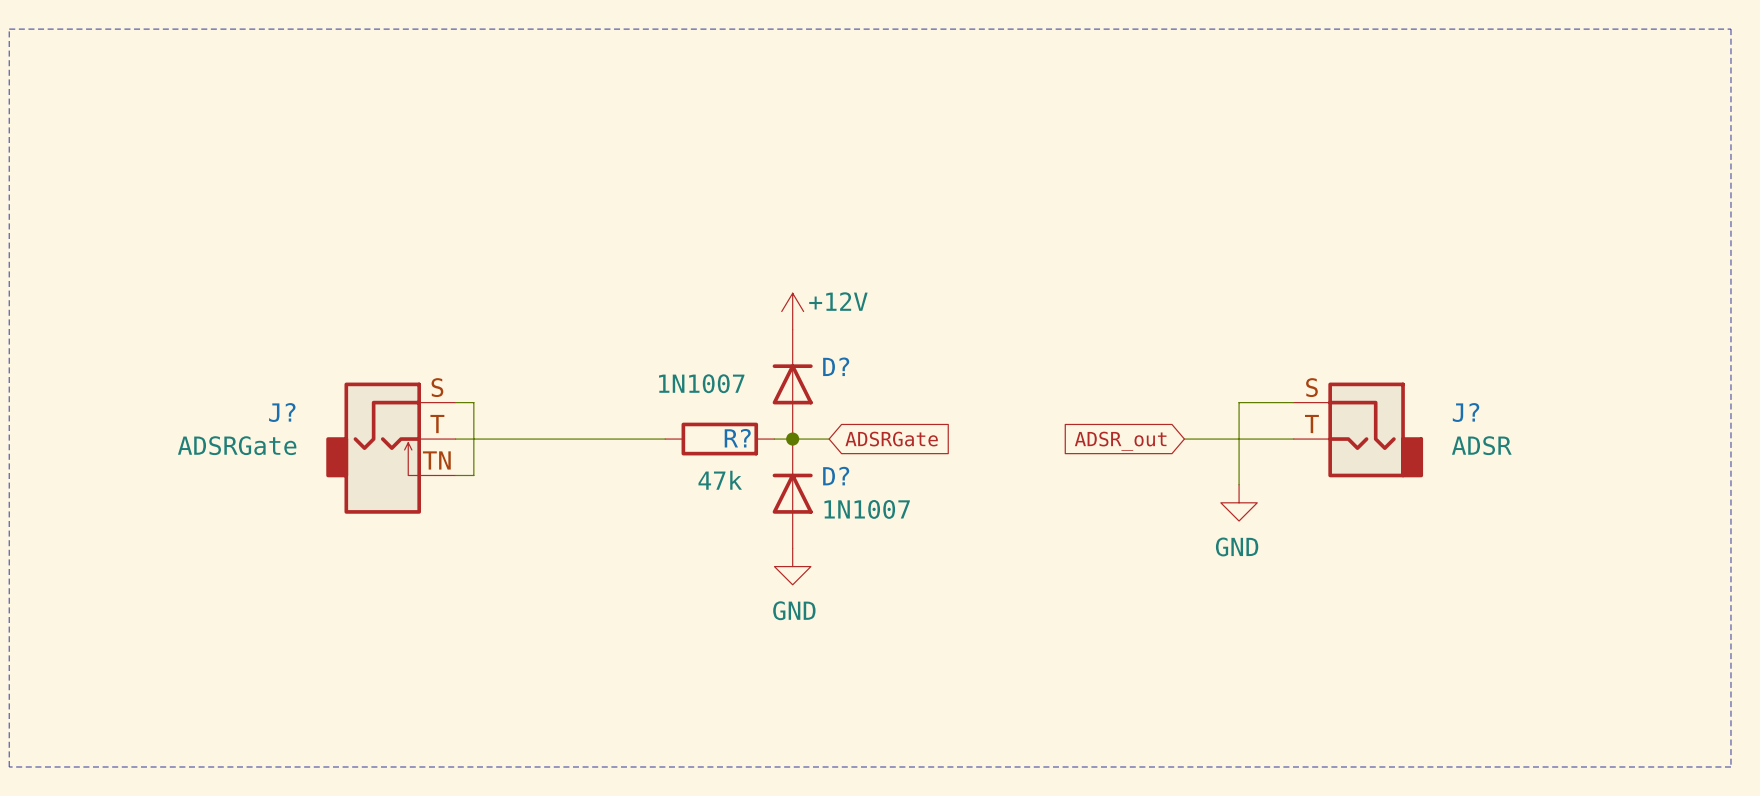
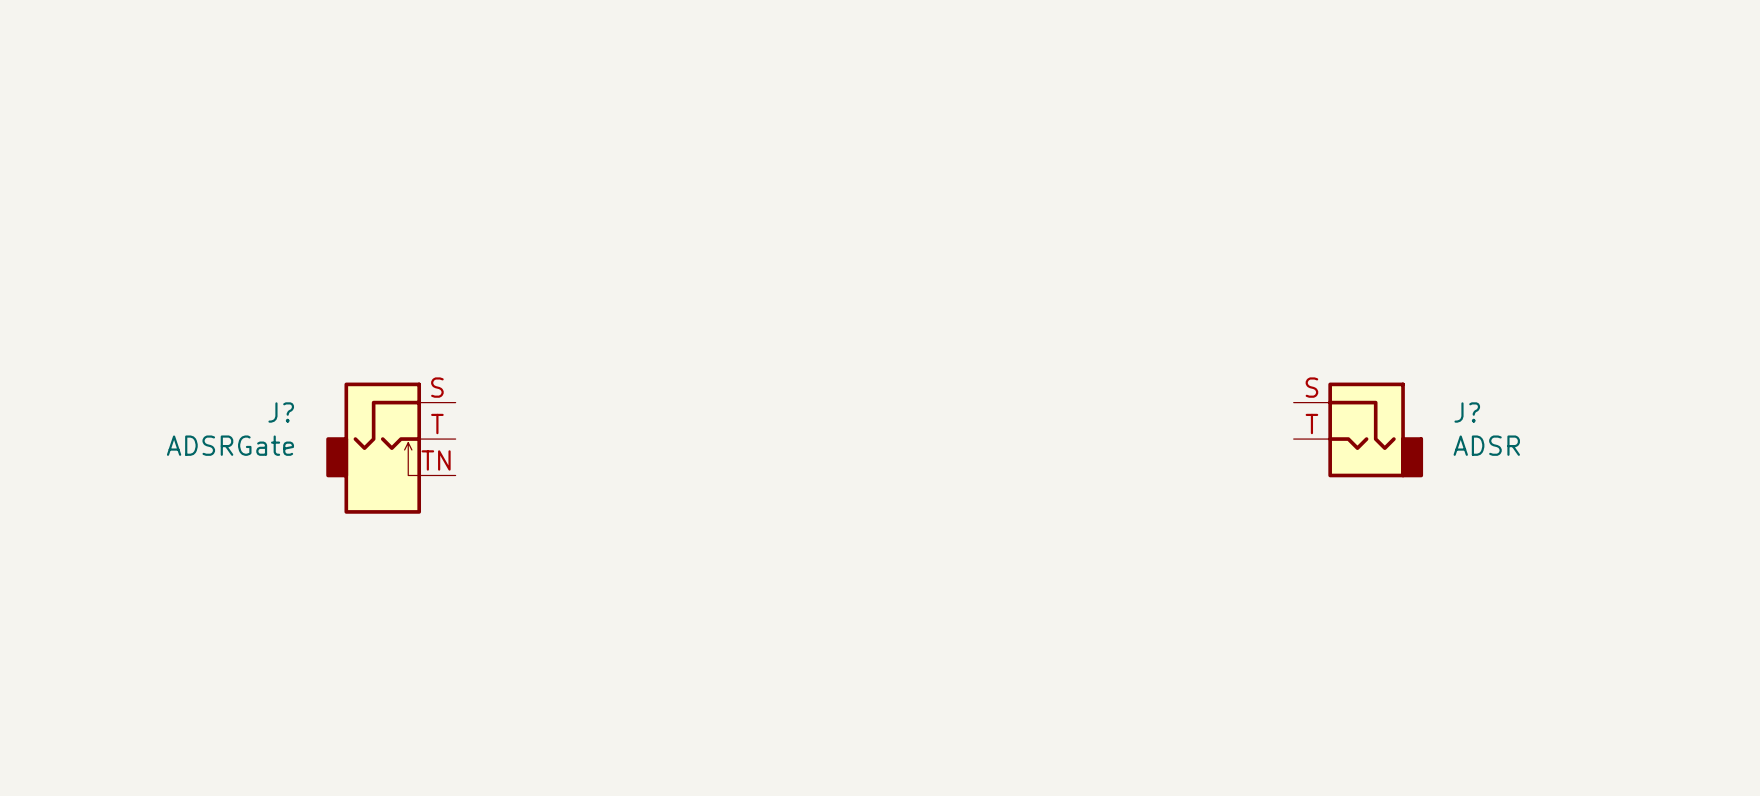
line: (9, 29) (1730, 29) (1730, 767) (9, 767) (9, 29) -> none
power symbol: +12V (792, 311) -> none
D?: 1N1007 (792, 384) -> none
wire: (455, 402) (473, 402) (473, 475) (455, 475) -> none
wire: (1293, 402) (1239, 402) (1239, 484) -> none
wire: (455, 439) (665, 439) -> none
R?: 47k (719, 439) -> none
wire: (774, 439) (829, 439) -> none
junction: (792, 439) -> none
global label: ADSRGate (891, 439) -> none
wire: (1184, 439) (1293, 439) -> none
global label: ADSR_out (1120, 441) -> none
D?: 1N1007 (792, 493) -> none
power symbol: GND (1239, 502) -> none
power symbol: GND (792, 566) -> none

